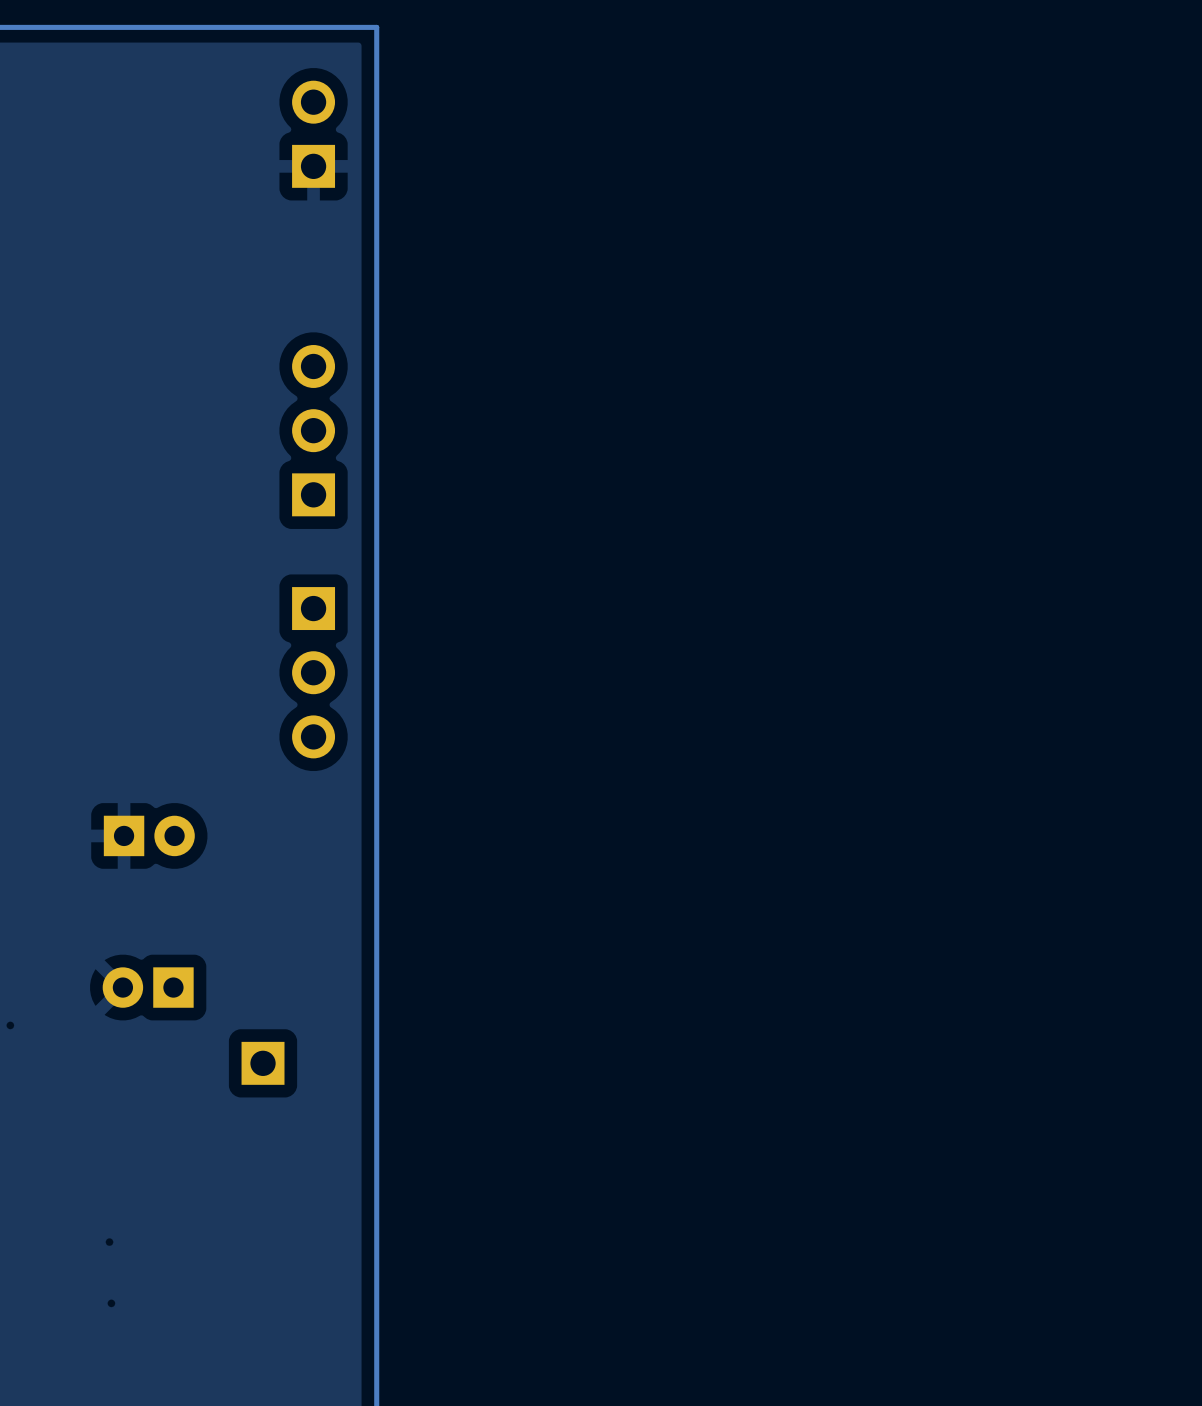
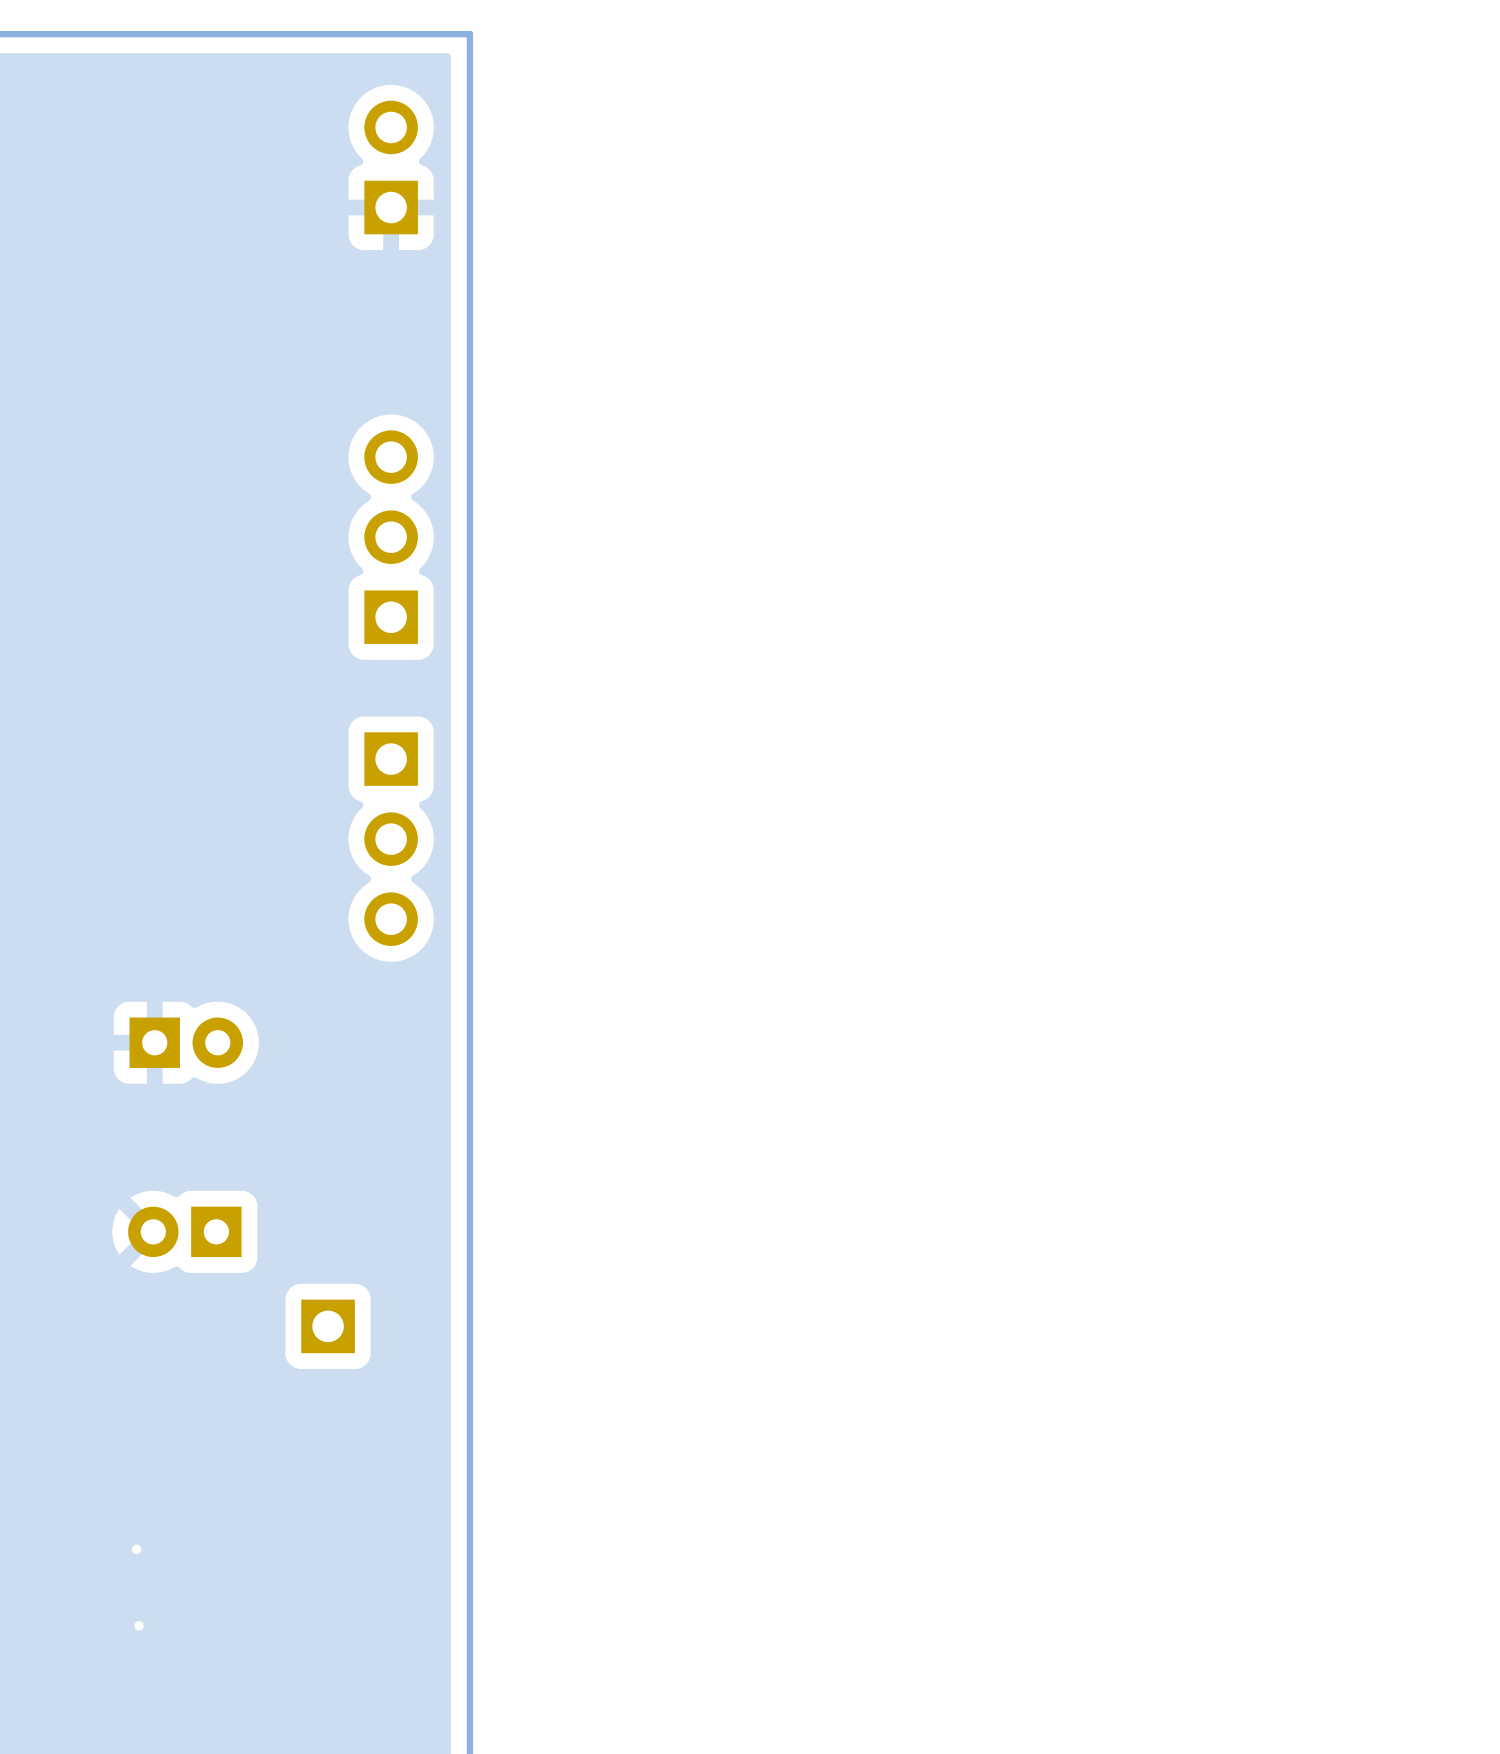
via: (10, 1025) -> none

